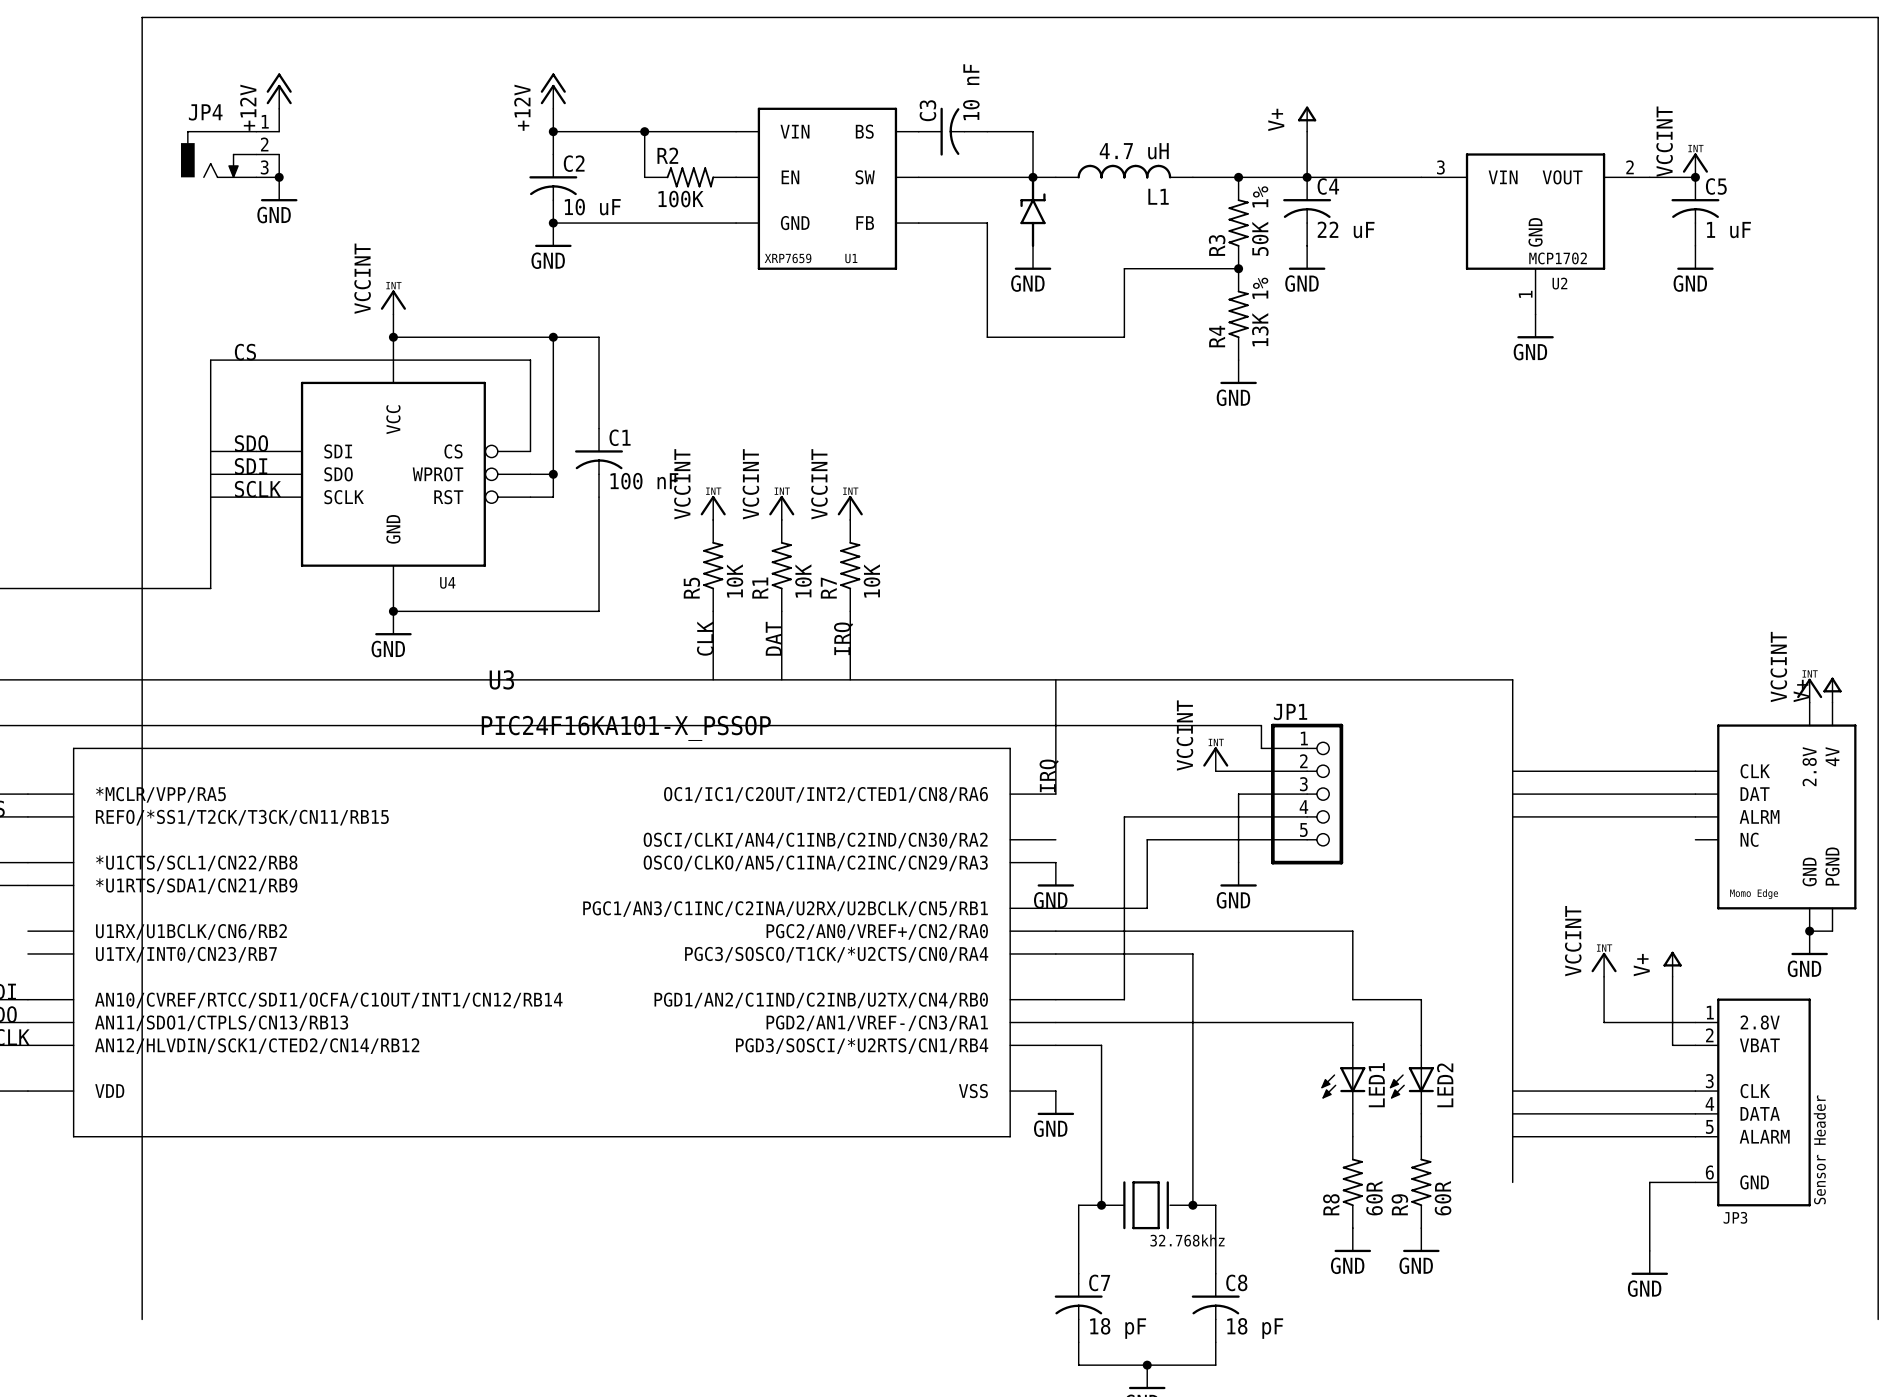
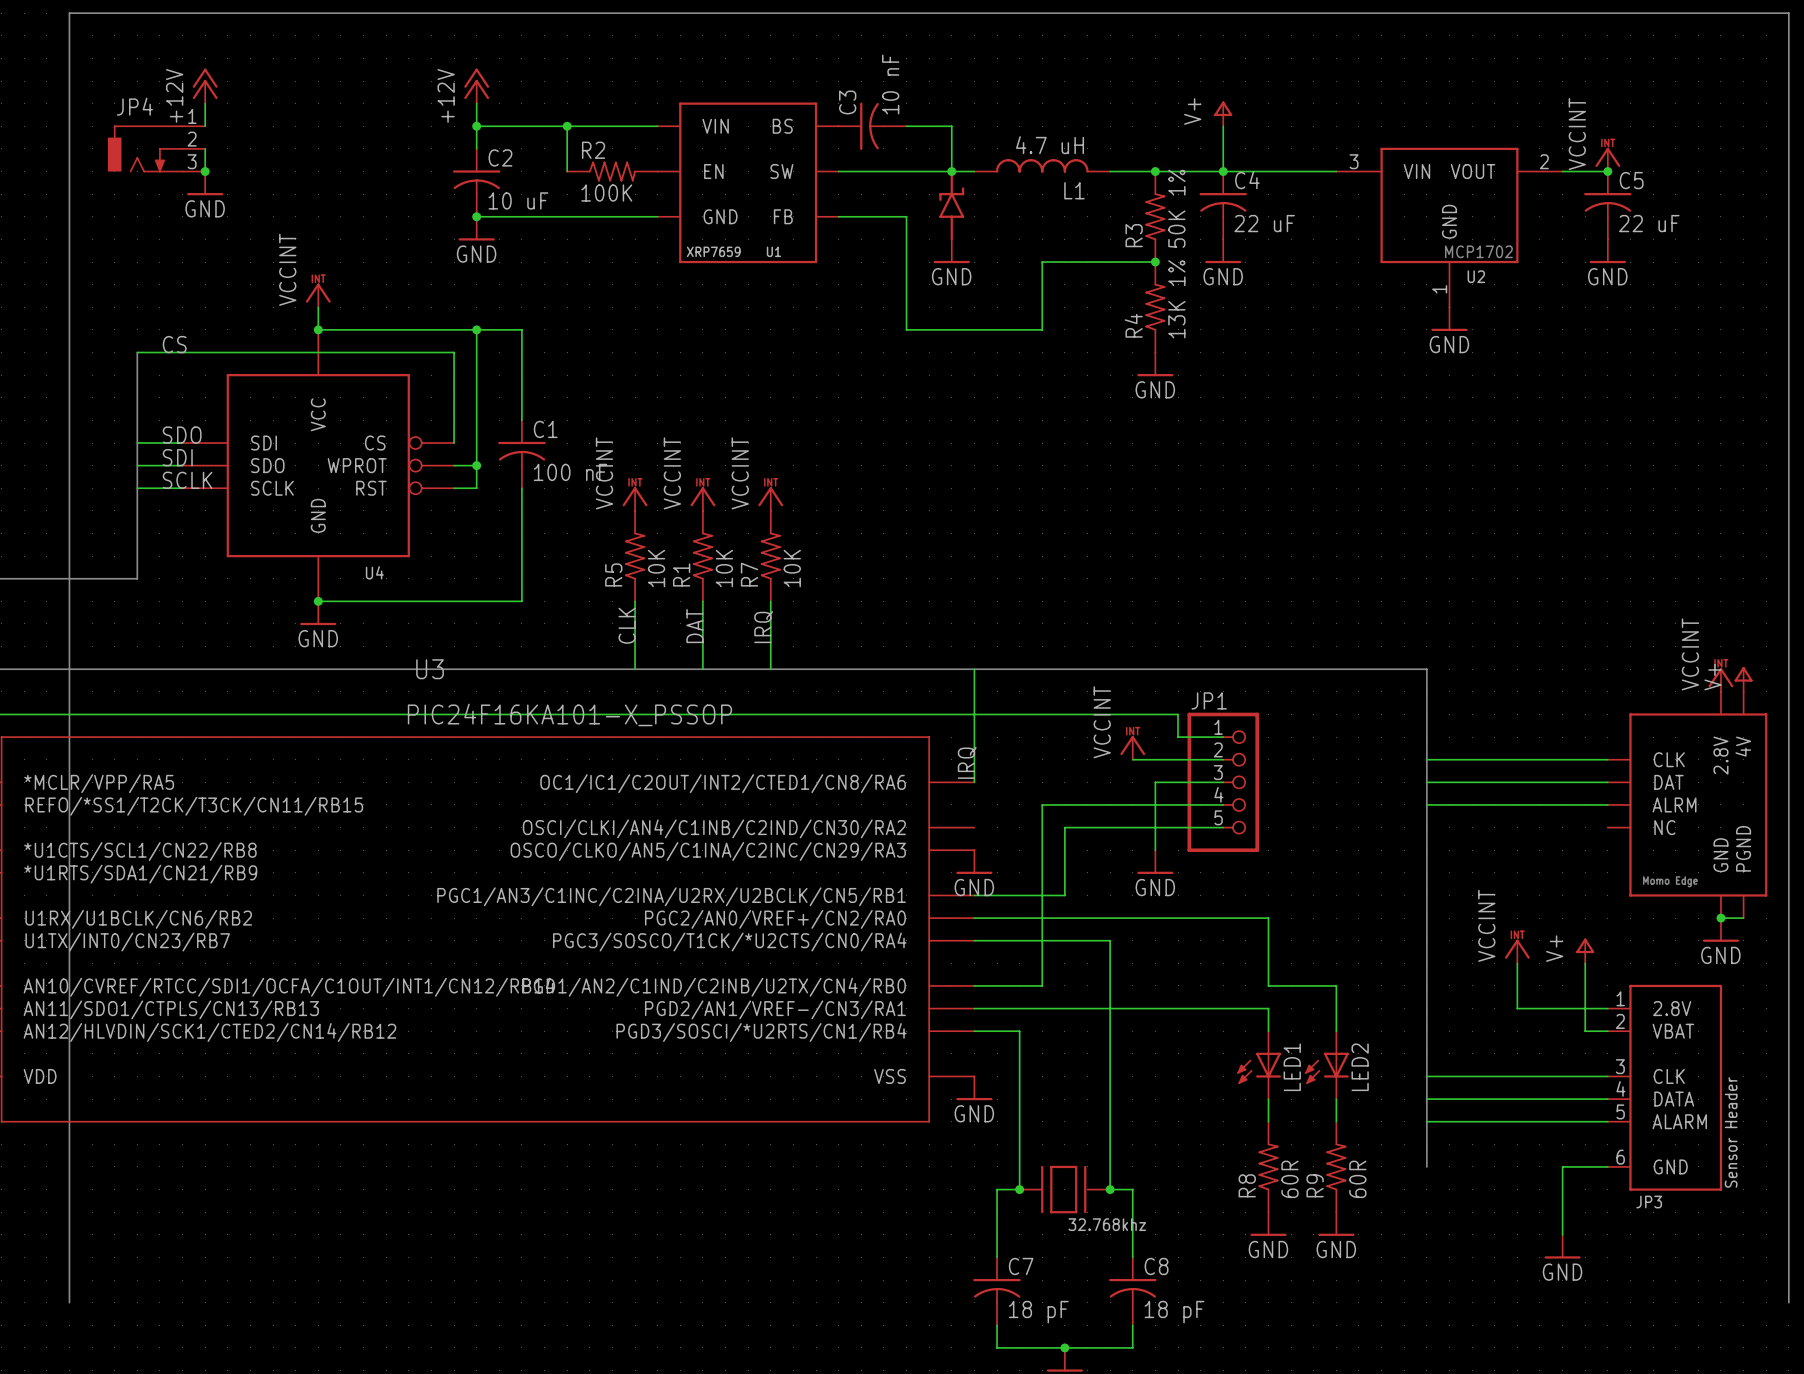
C5 value: 1 uF (1728, 230) -> 22 uF (1649, 223)

